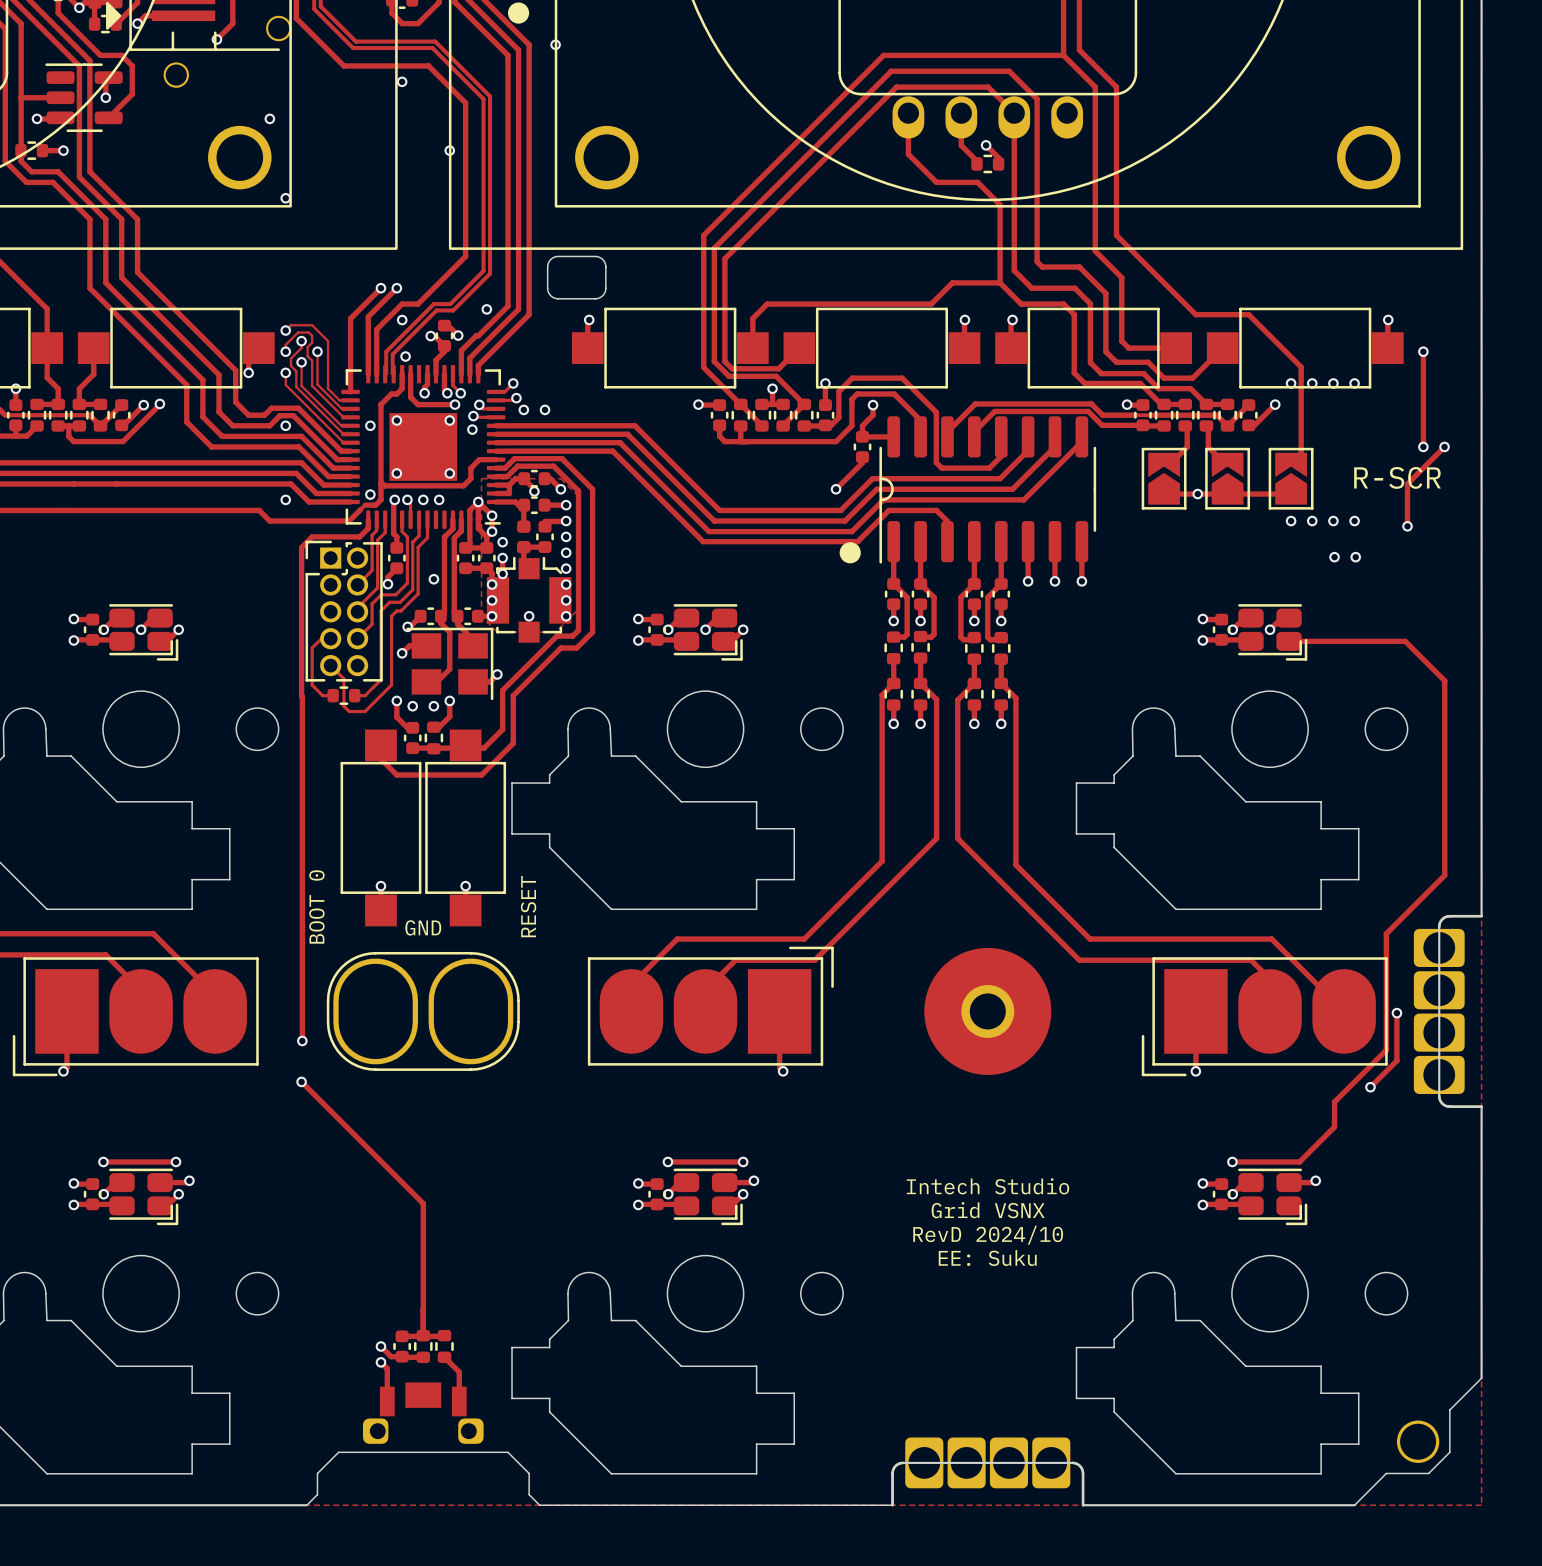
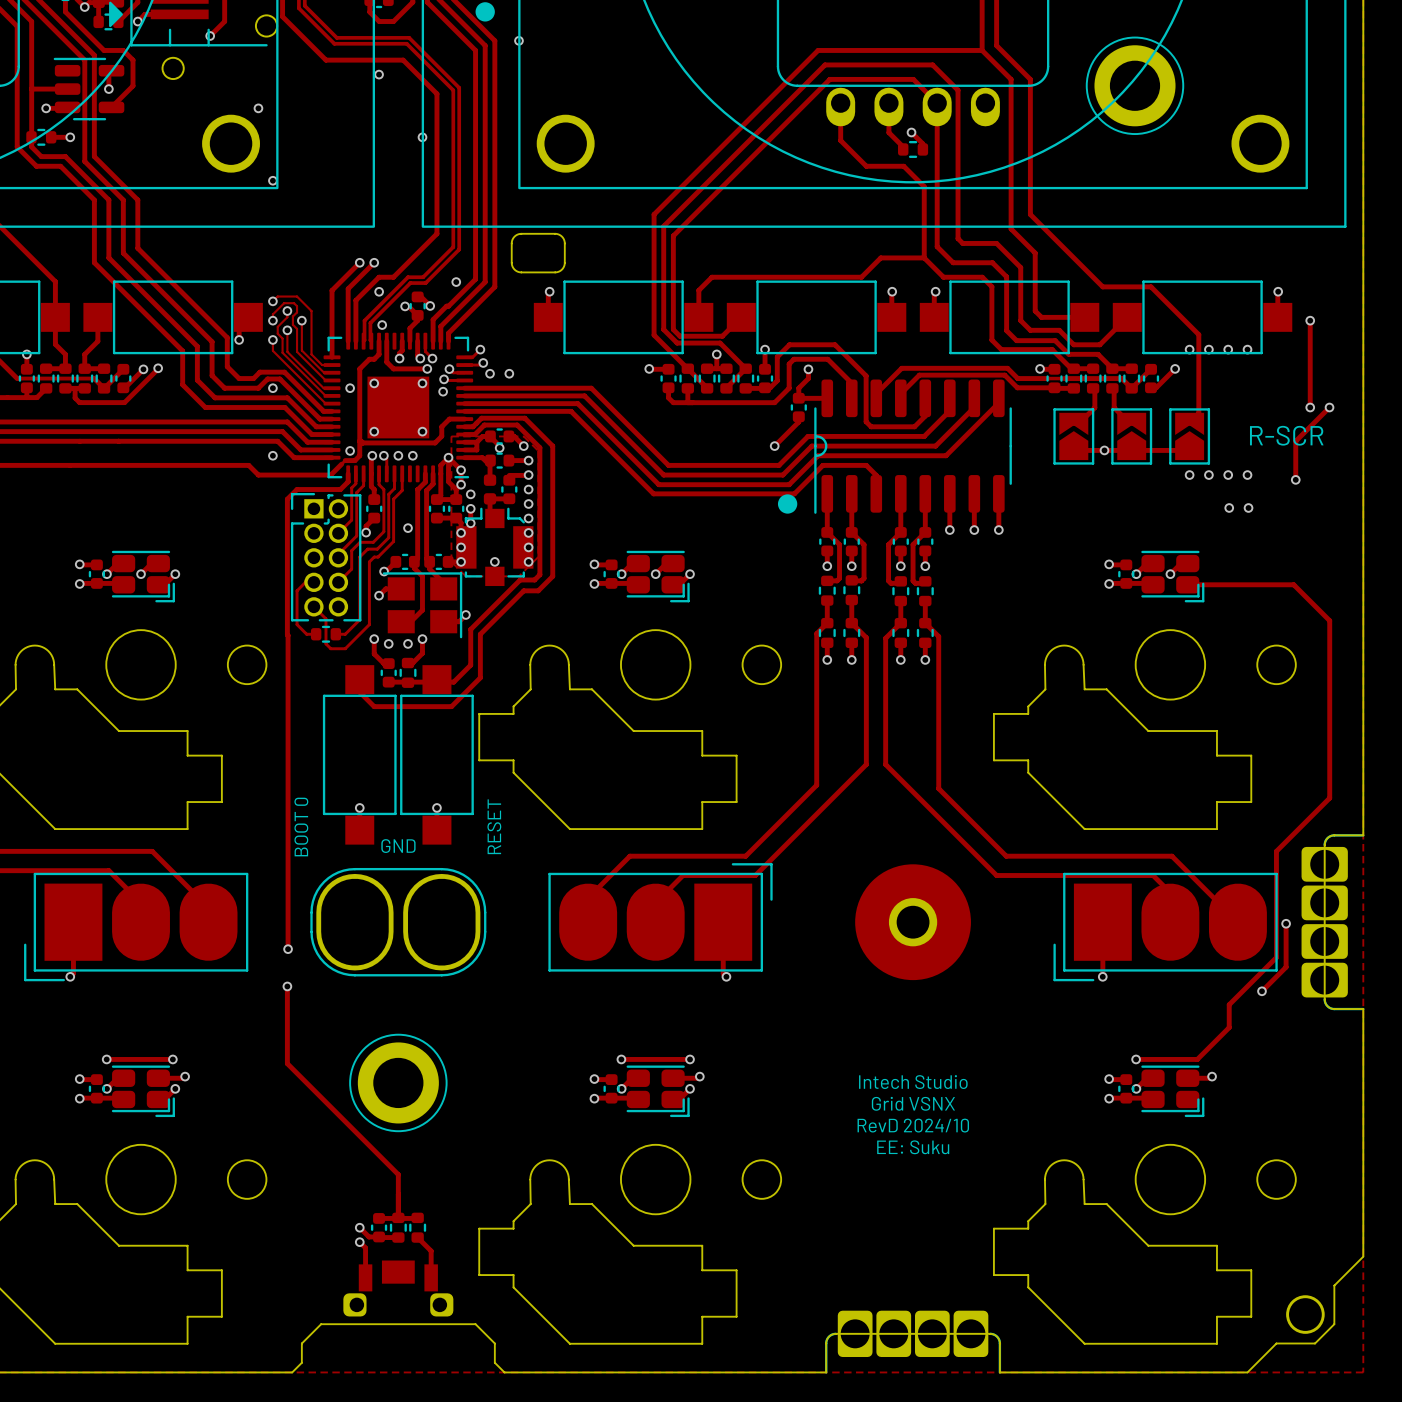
part: none -> (1134, 85)
track: (301, 1081) (423, 1203) (423, 1288) -> (287, 986) (287, 1063) (398, 1174)
part: none -> (398, 1082)

